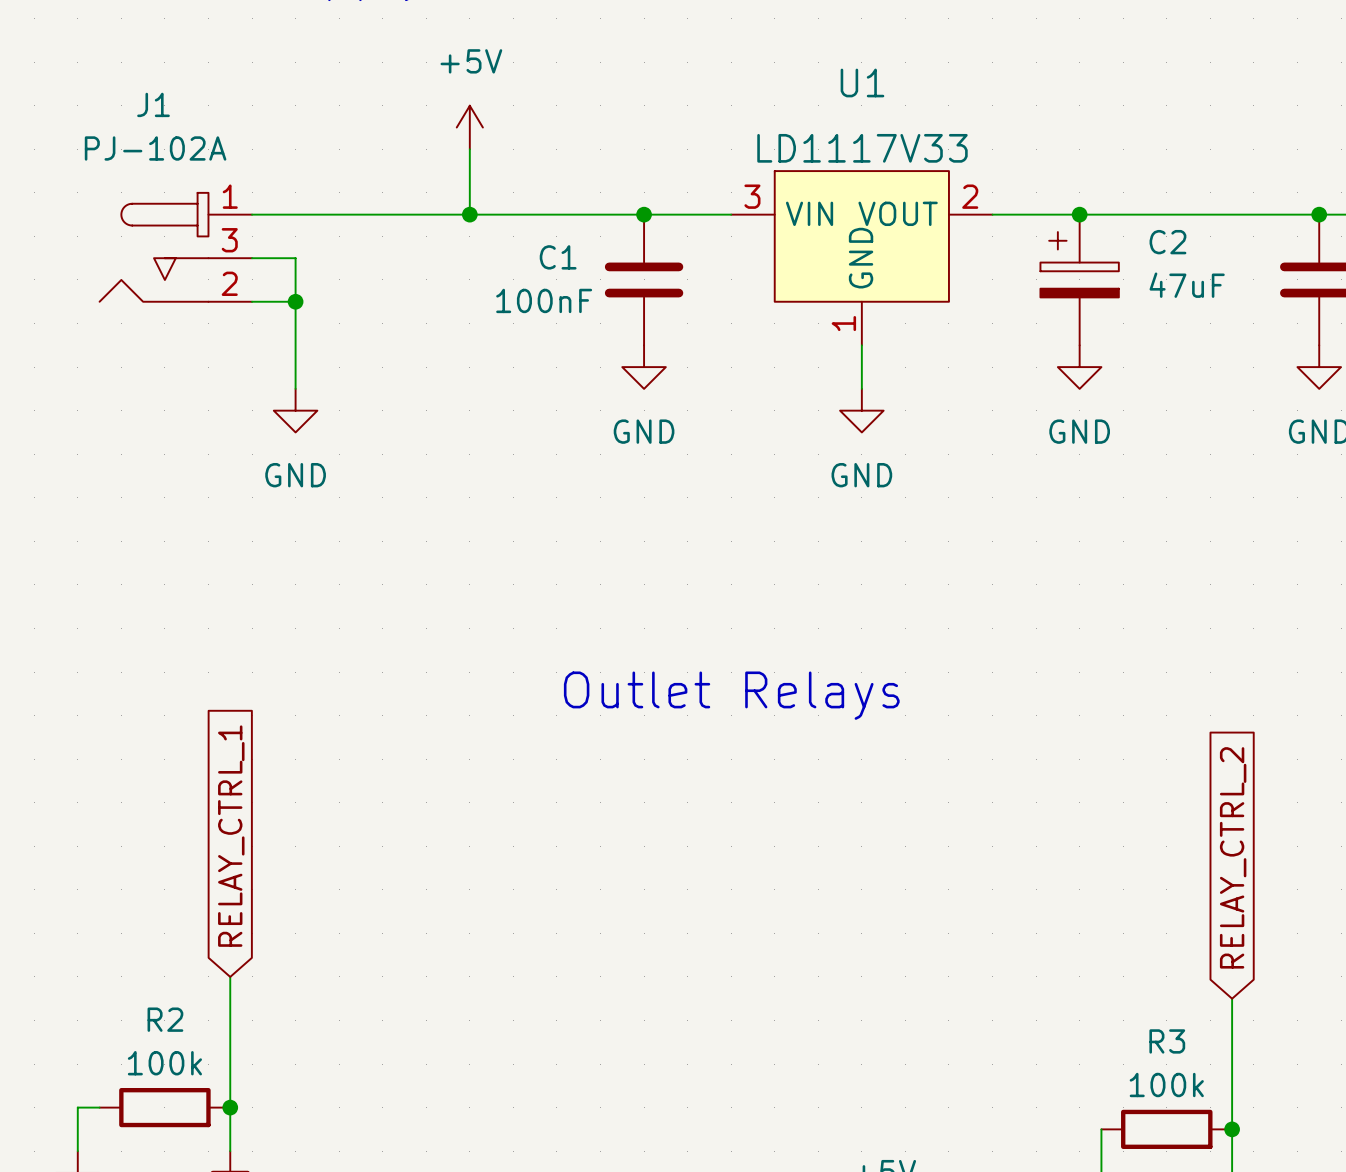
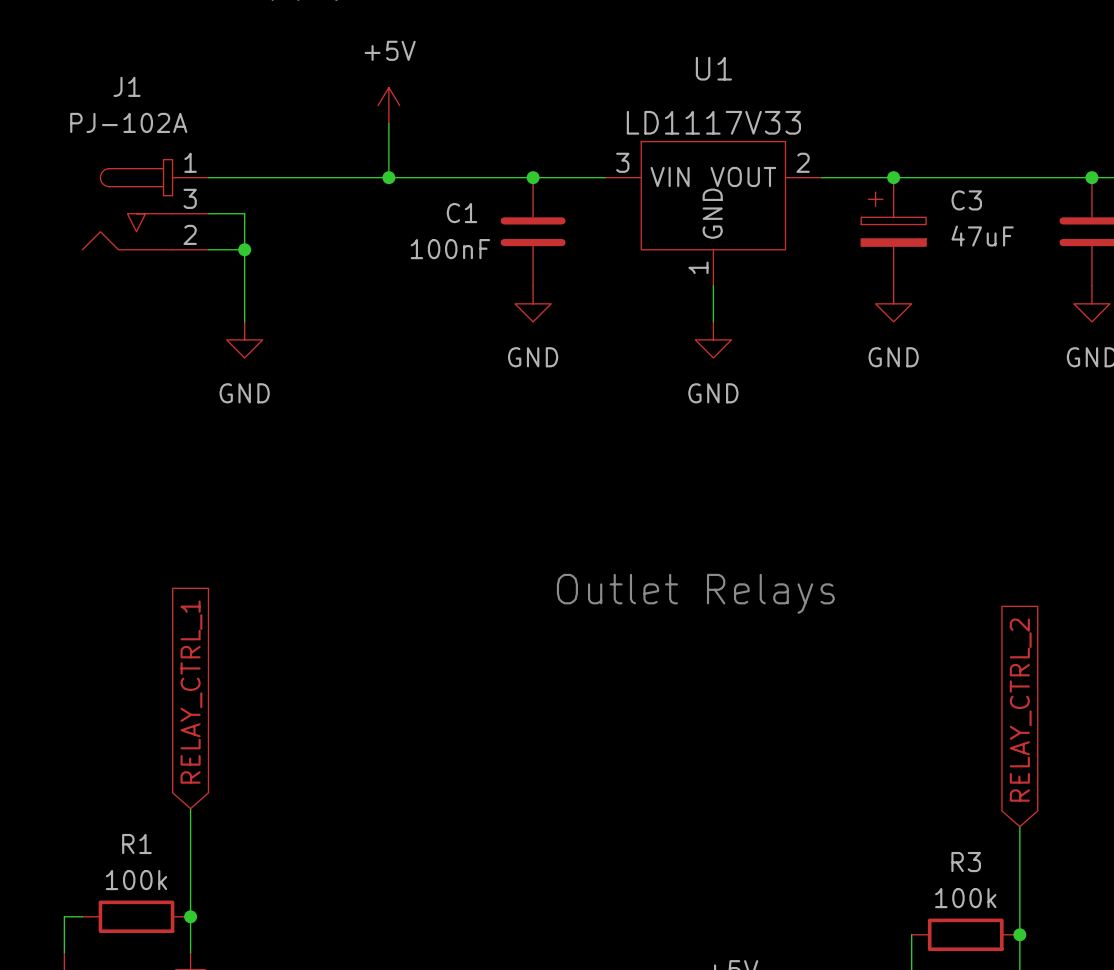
C2 name: C2 (1167, 242) -> C3 (966, 200)
text position: Outlet Relays (731, 695) -> Outlet Relays (695, 593)
R2 name: R2 (165, 1019) -> R1 (136, 844)

